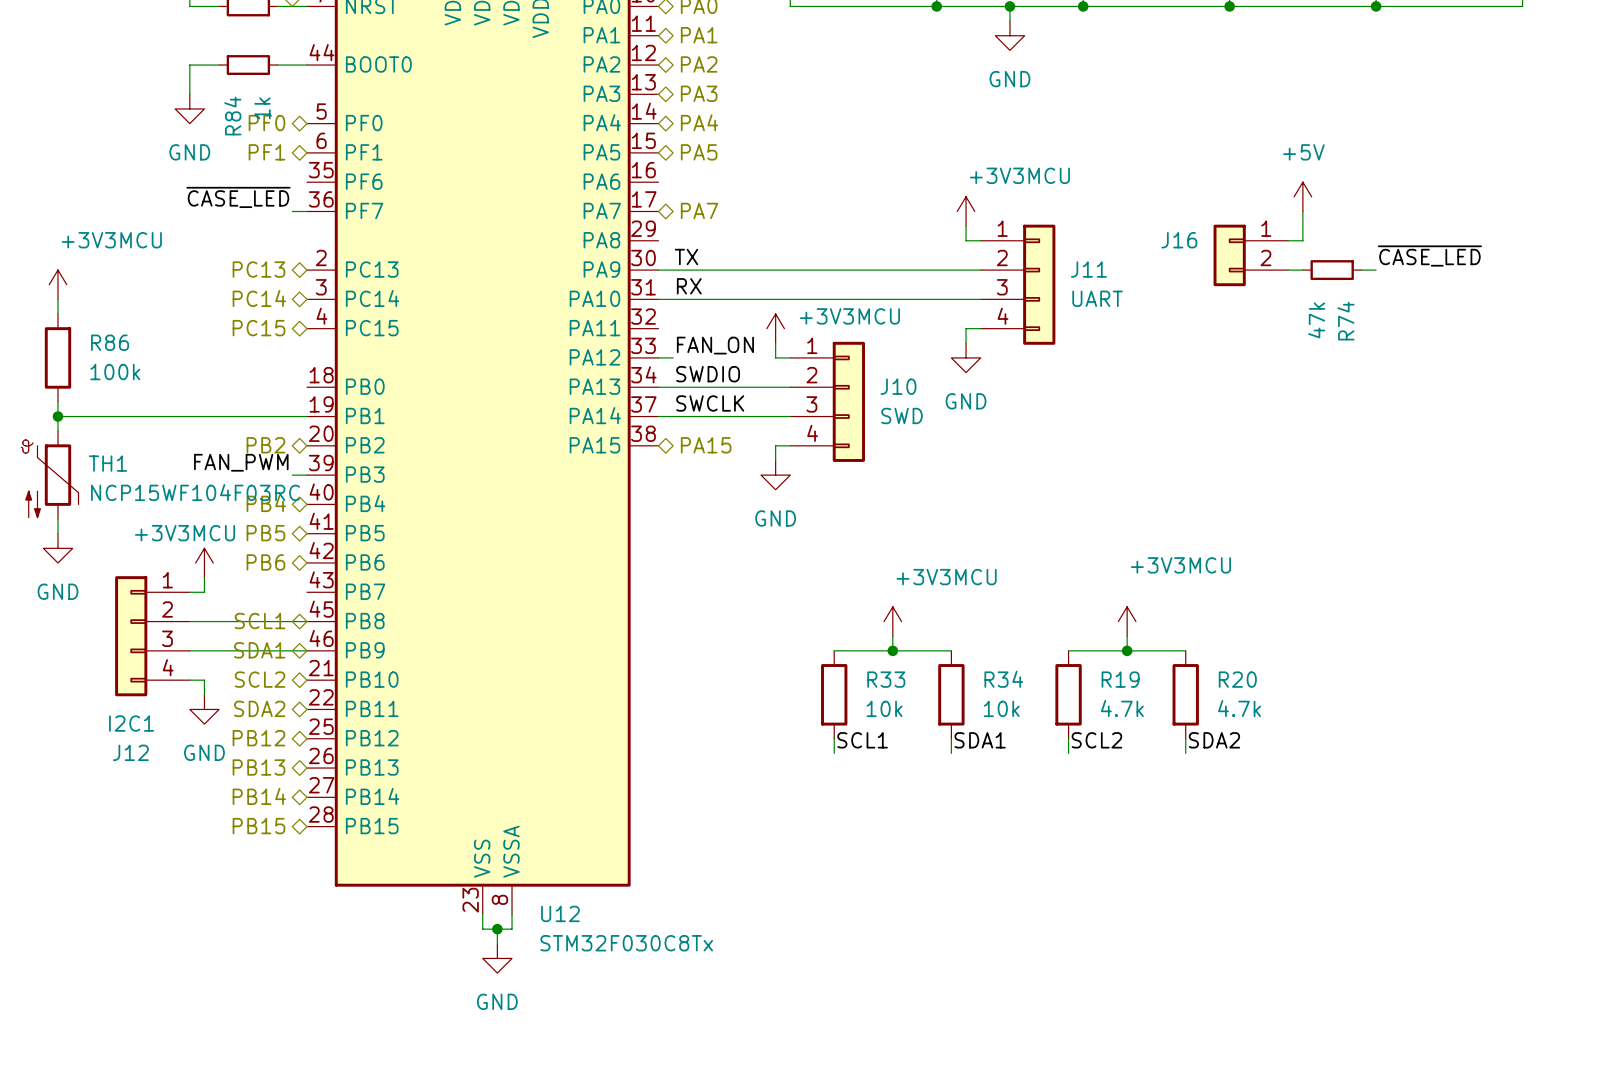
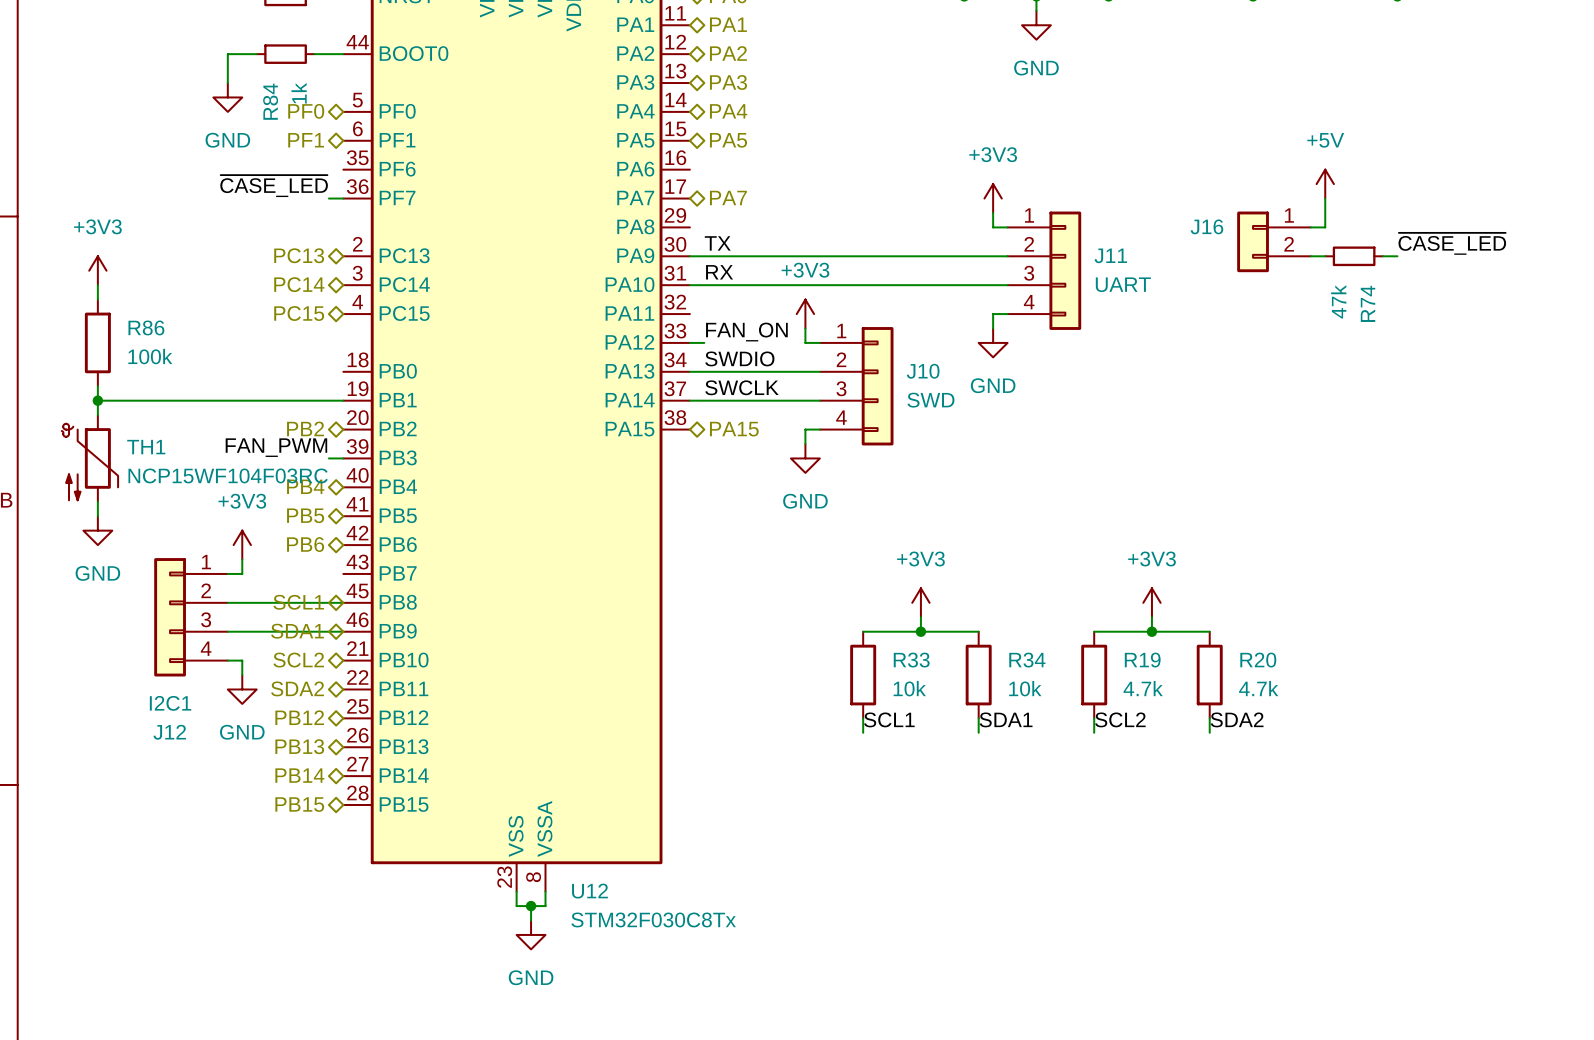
power symbol: +3V3MCU (966, 211) -> +3V3 (993, 198)
power symbol: +3V3MCU (57, 284) -> +3V3 (97, 270)
power symbol: +3V3MCU (775, 328) -> +3V3 (805, 314)
power symbol: +3V3MCU (204, 562) -> +3V3 (242, 545)
power symbol: +3V3MCU (892, 621) -> +3V3 (920, 602)
power symbol: +3V3MCU (1127, 621) -> +3V3 (1151, 602)

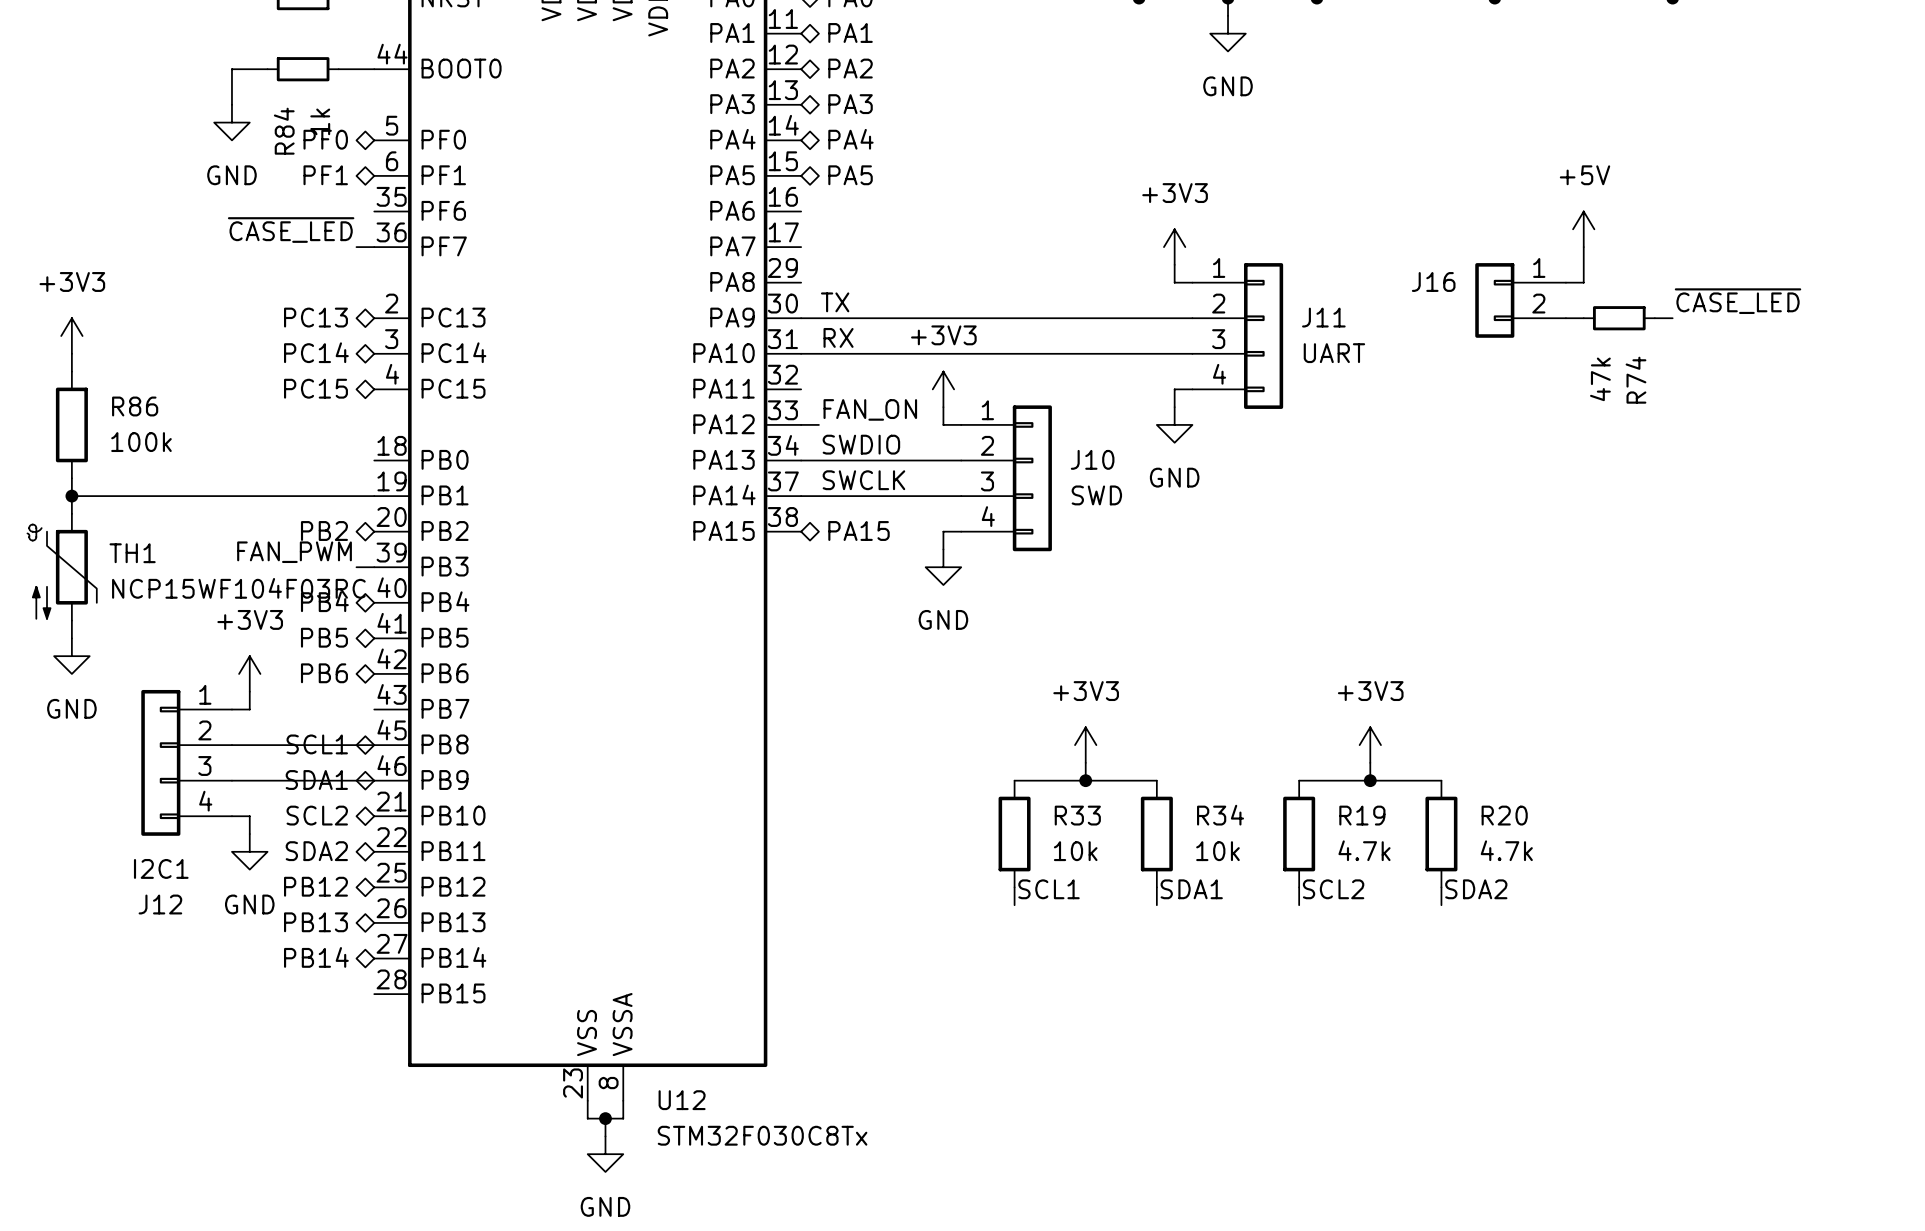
hierarchical label: PA7 (728, 197) -> none
hierarchical label: PB15 (299, 804) -> none

